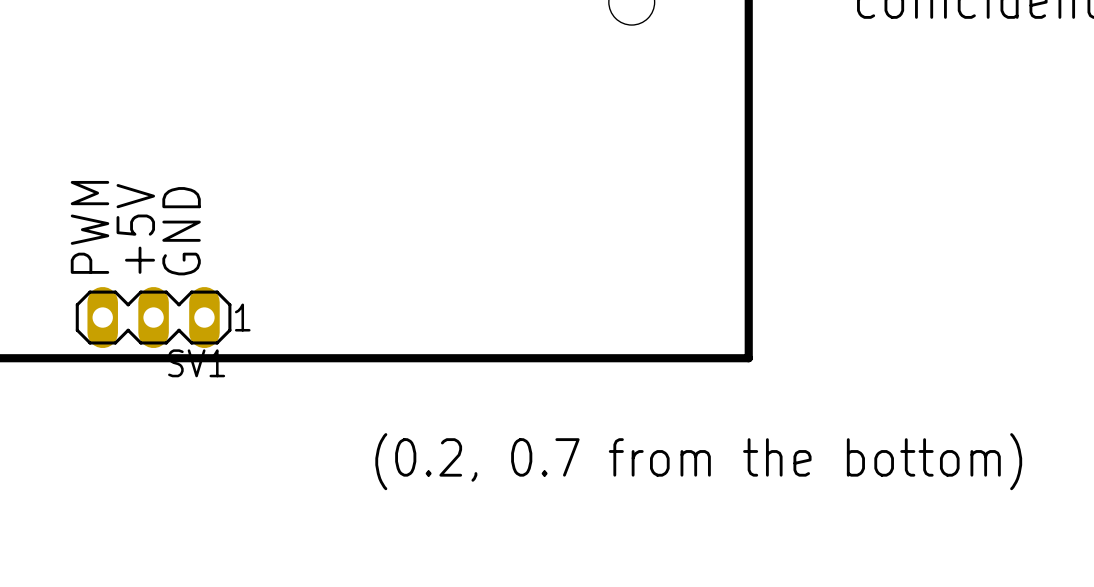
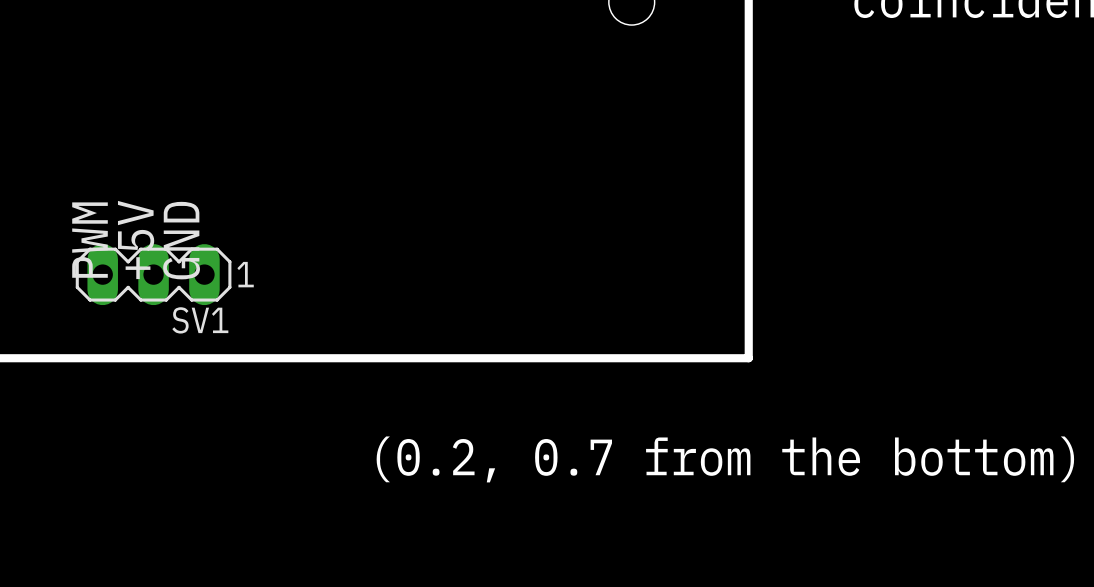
SV1 position: (153, 317) -> (153, 274)

